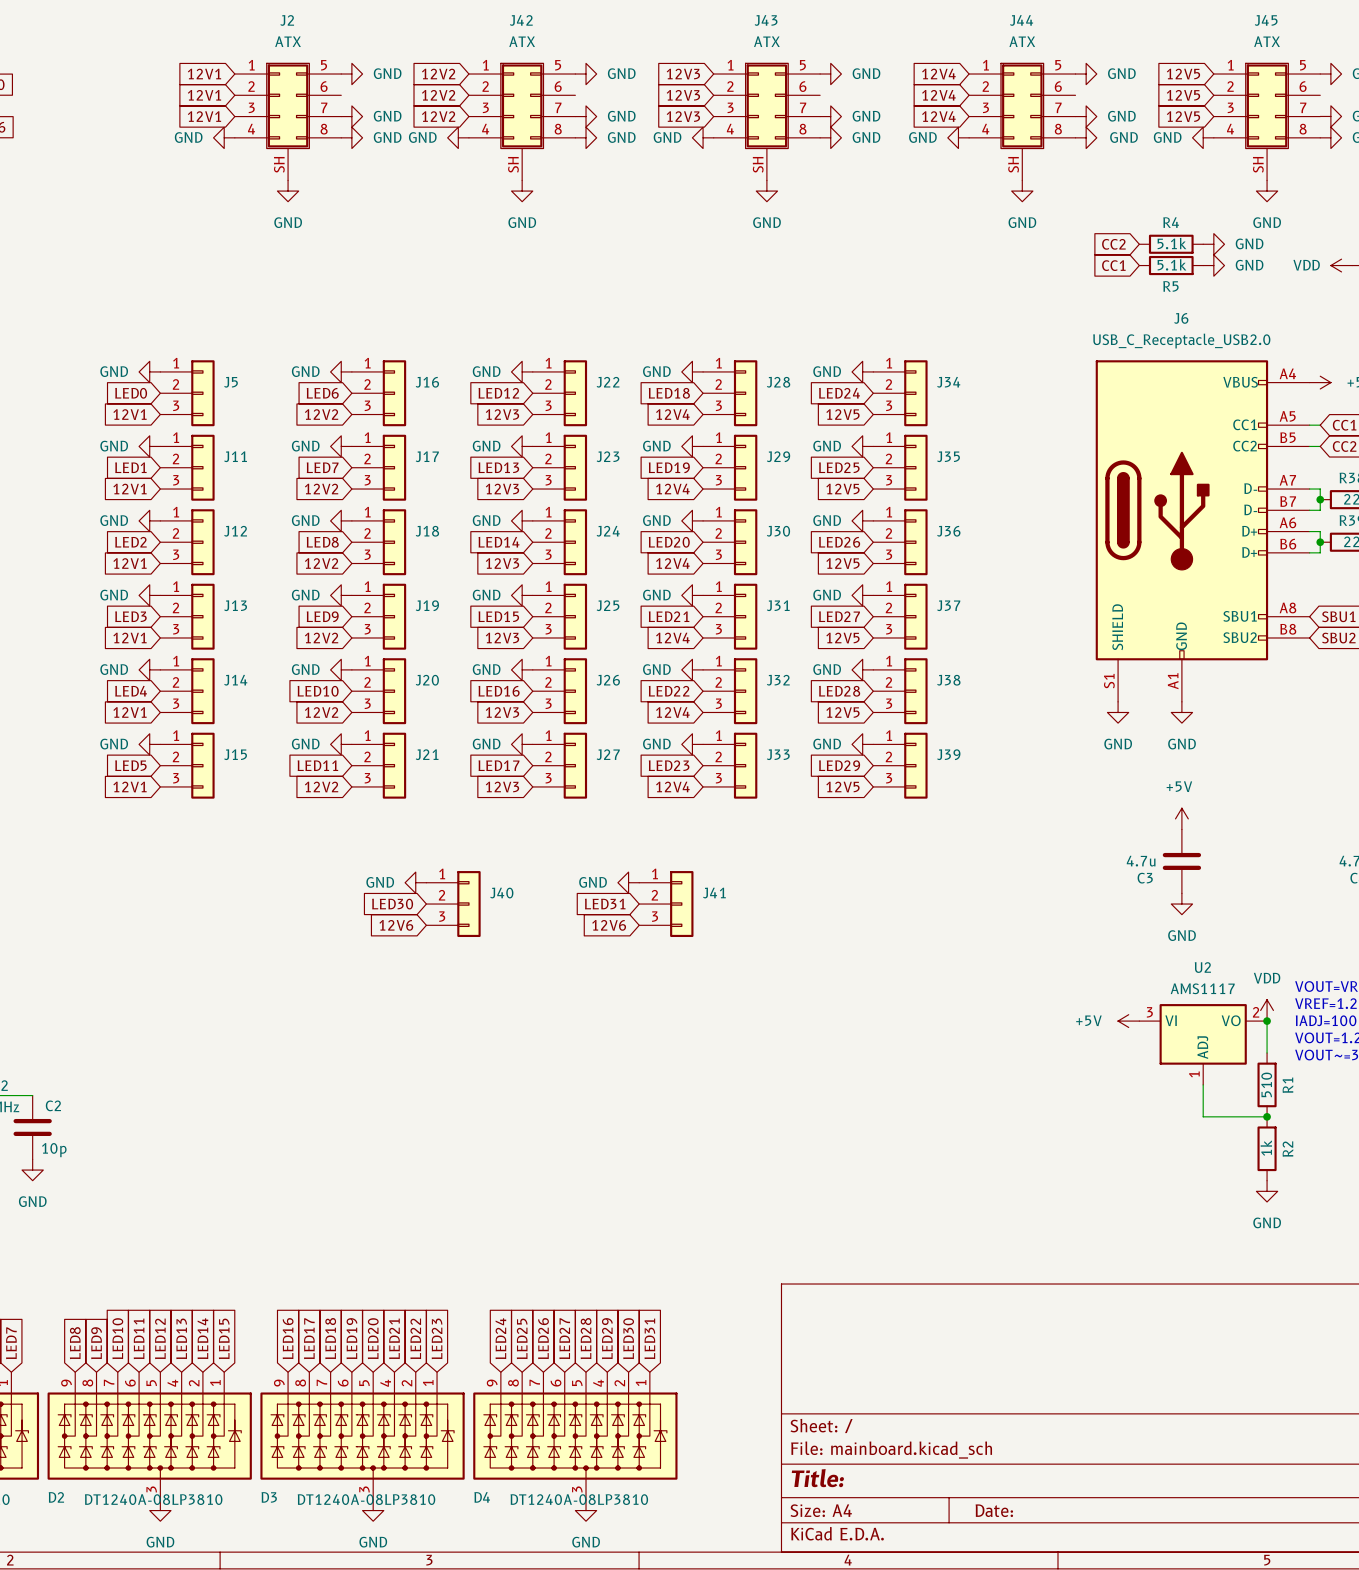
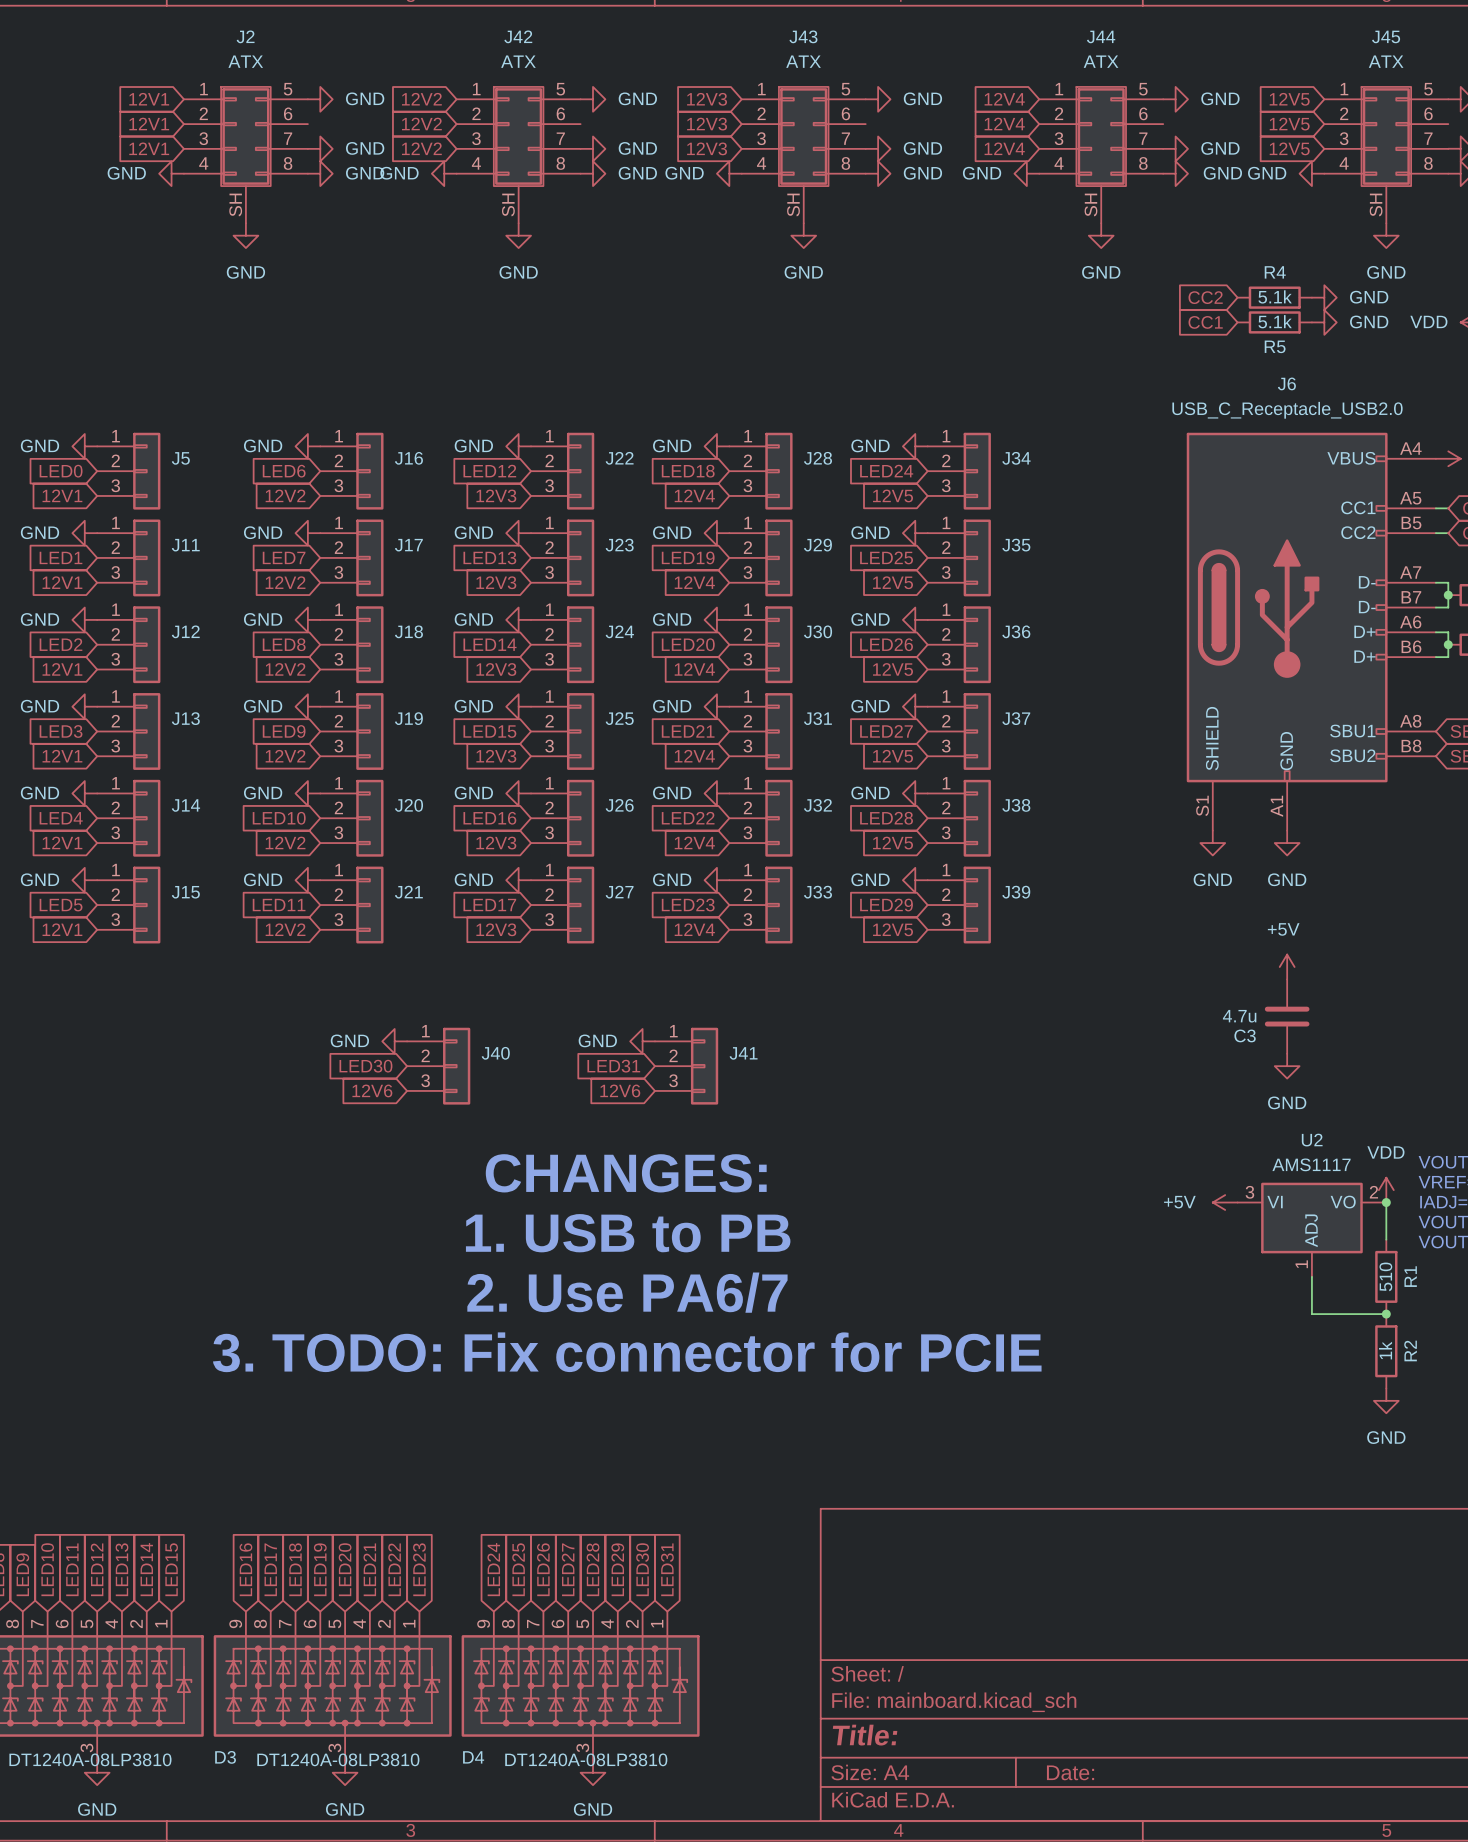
text: none -> CHANGES: (626, 1173)
text: none -> 1. USB to PB (628, 1233)
text: none -> 2. Use PA6/7 (627, 1292)
text: none -> 3. TODO: Fix connector for PCIE (627, 1352)

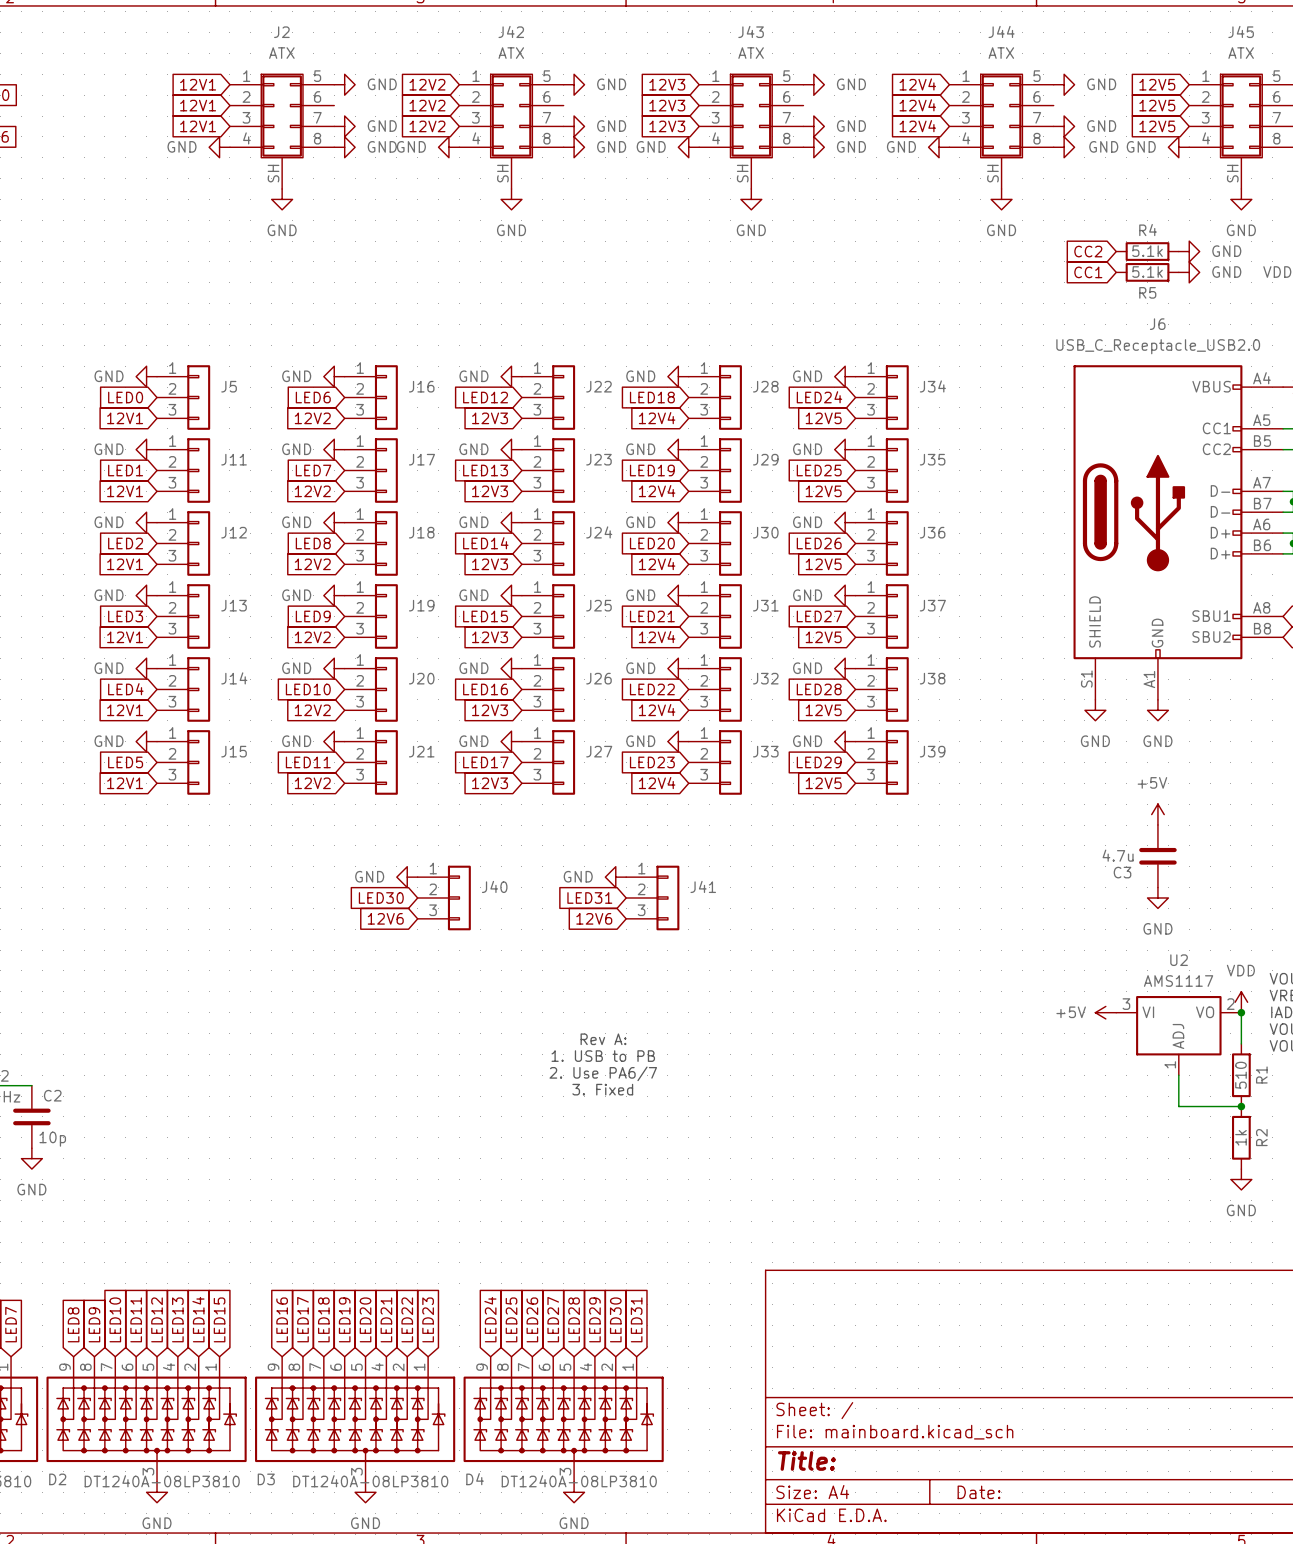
text: CHANGES: (626, 1173) -> none
text: 1. USB to PB (628, 1233) -> Rev A: (603, 1039)
text: none -> 1. USB to PB (603, 1056)
text: none -> 2. Use PA6/7 (603, 1073)
text: 2. Use PA6/7 (627, 1292) -> 3. Fixed (602, 1089)
text: 3. TODO: Fix connector for PCIE (627, 1352) -> none

